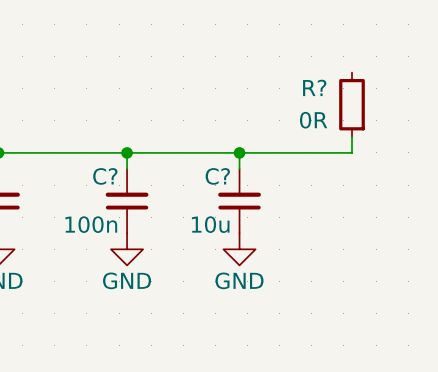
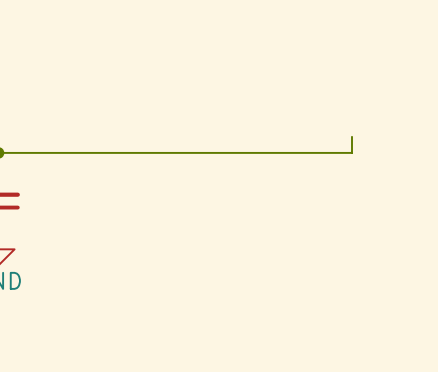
R?: (352, 104) -> none
wire: (127, 152) (127, 168) -> none
junction: (127, 152) -> none
wire: (239, 152) (239, 168) -> none
junction: (239, 152) -> none
C?: (127, 201) -> none
C?: (239, 201) -> none
power symbol: GND (127, 249) -> none
power symbol: GND (239, 249) -> none

